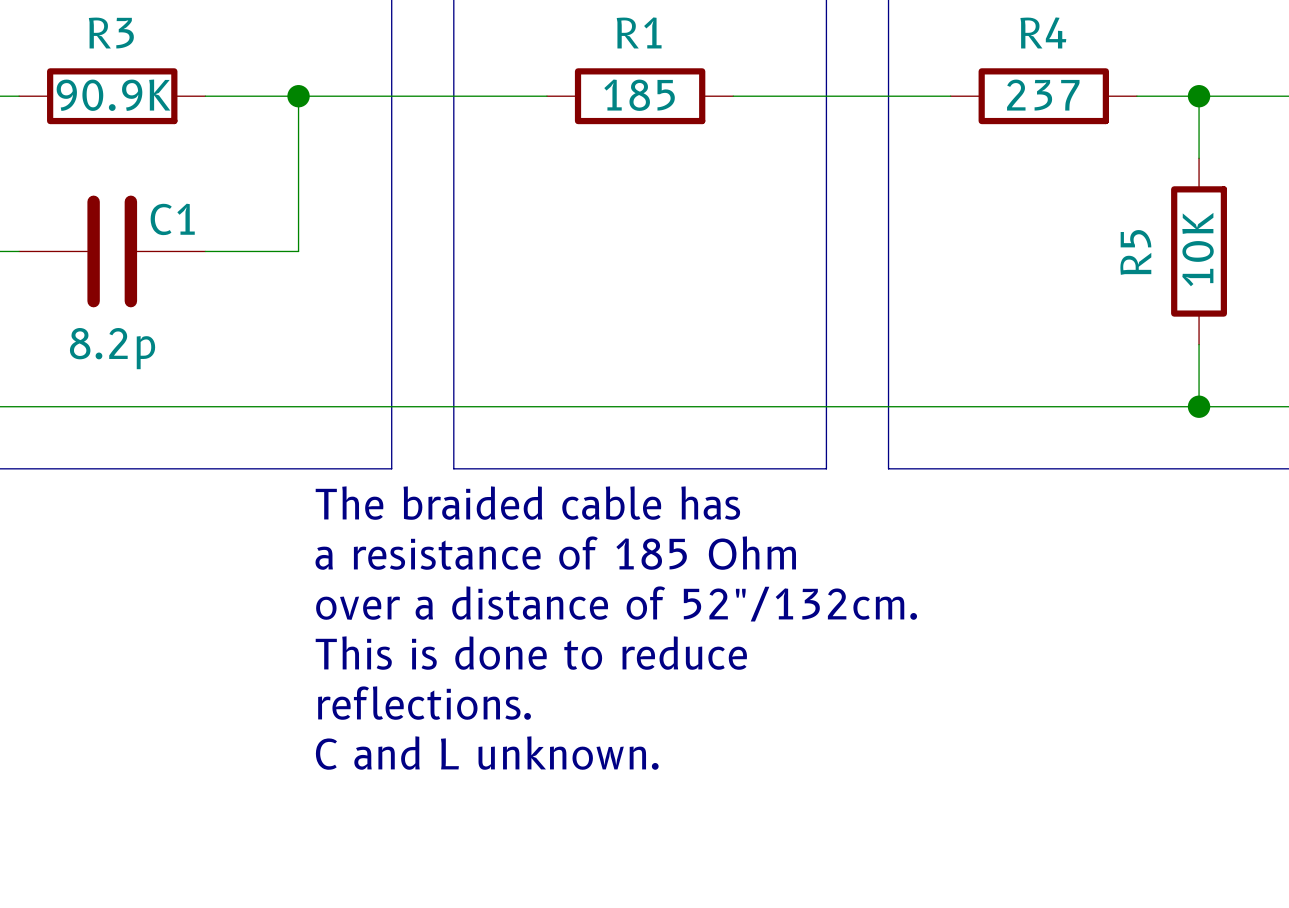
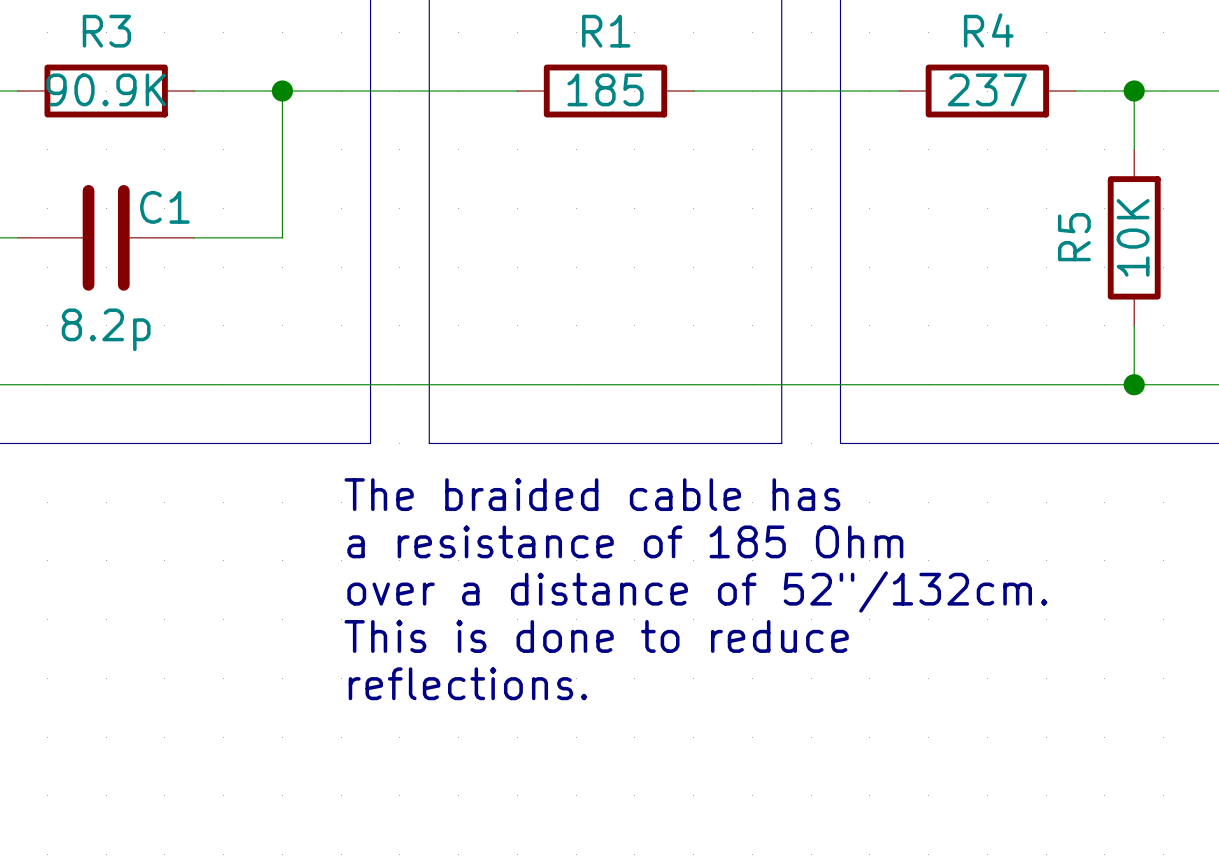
text position: The braided cable has (527, 503) -> The braided cable has (592, 494)
text position: a resistance of 185 Ohm (555, 553) -> a resistance of 185 Ohm (625, 541)
text position: over a distance of 52"/132cm. (616, 603) -> over a distance of 52"/132cm. (697, 591)
text position: This is done to reduce (531, 653) -> This is done to reduce (596, 636)
text position: reflections. (424, 703) -> reflections. (467, 683)
text: C and L unknown. (487, 753) -> none

